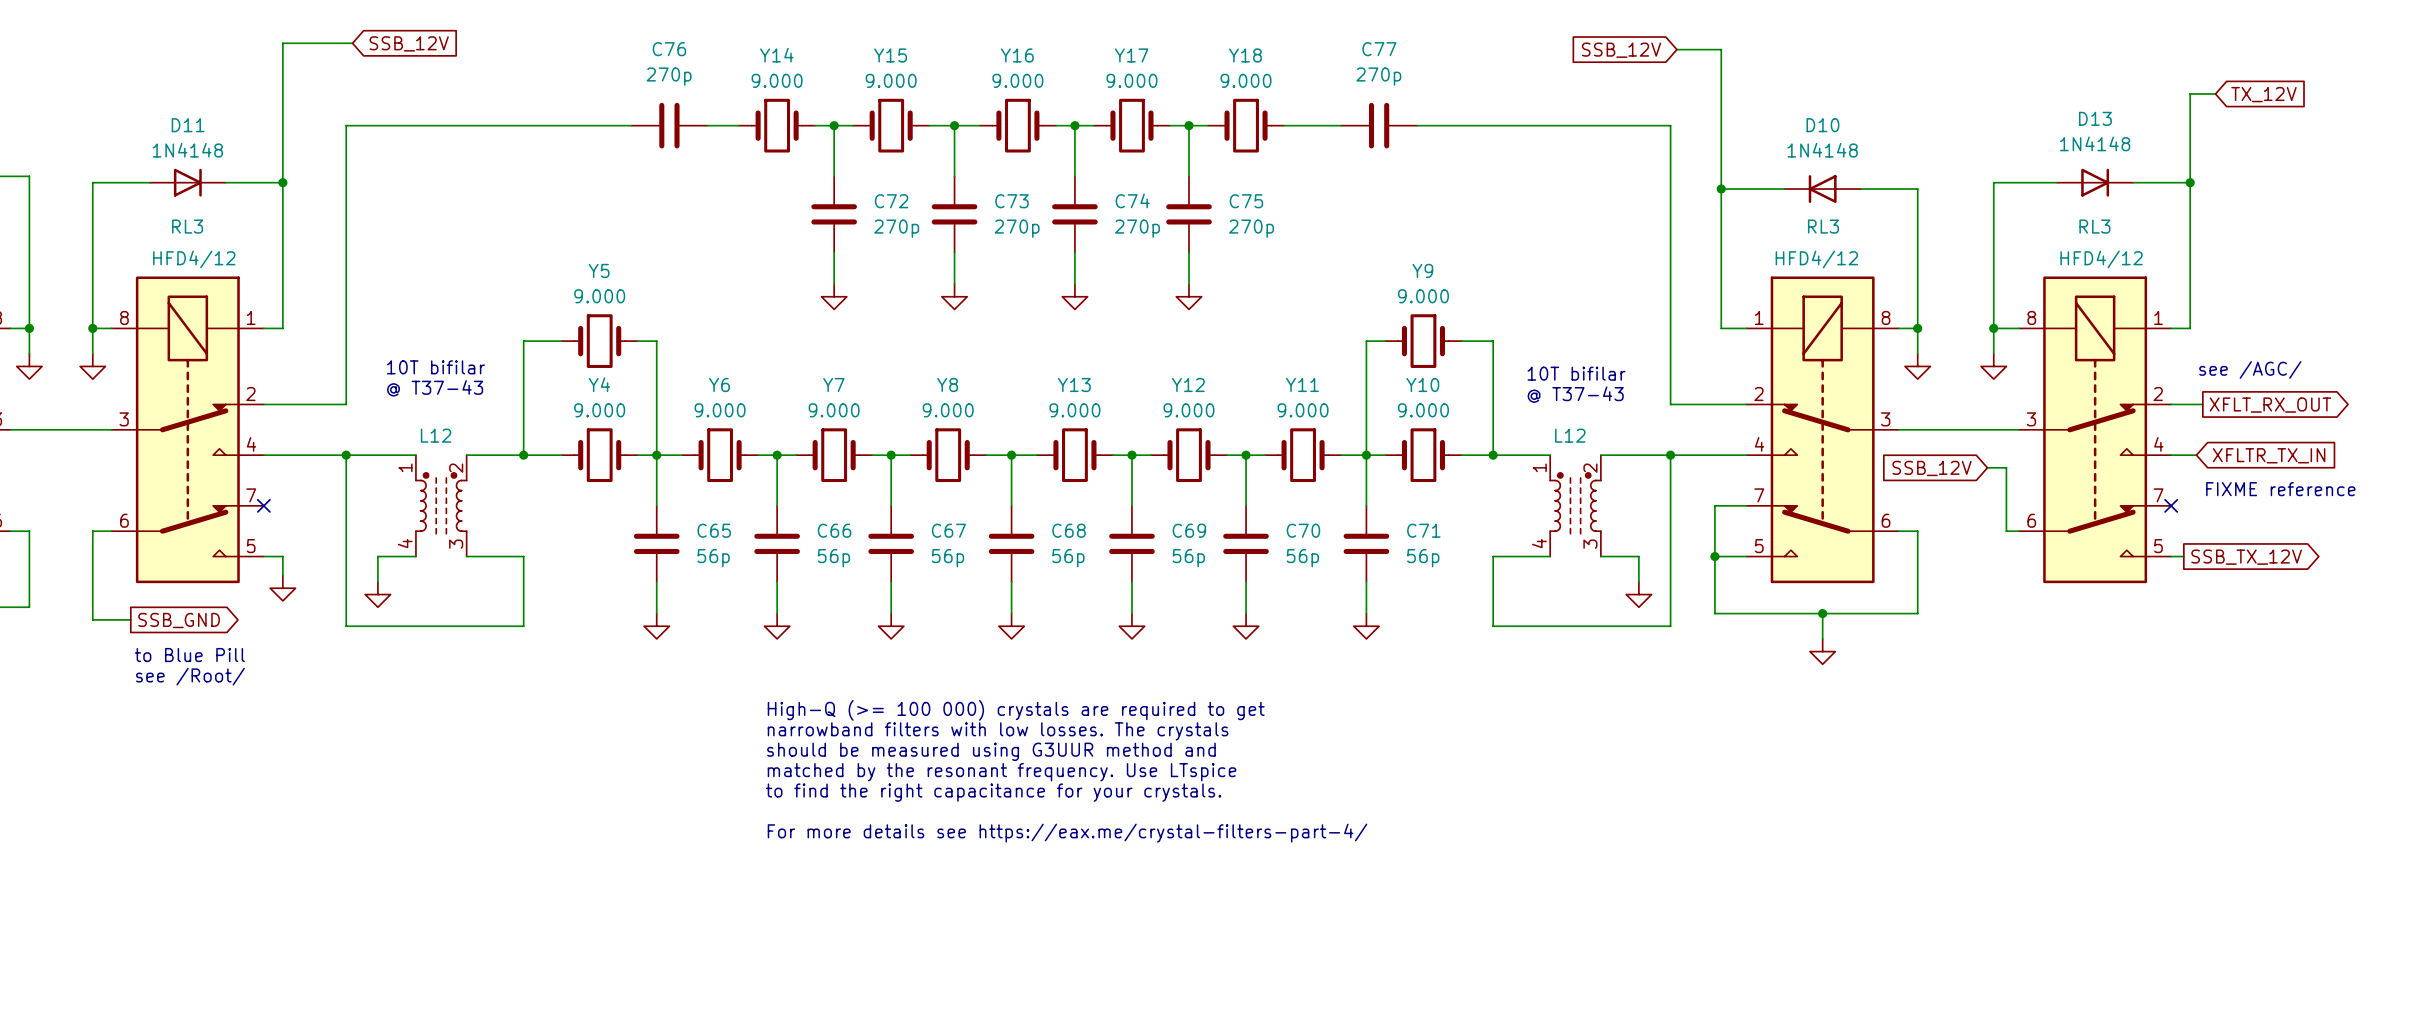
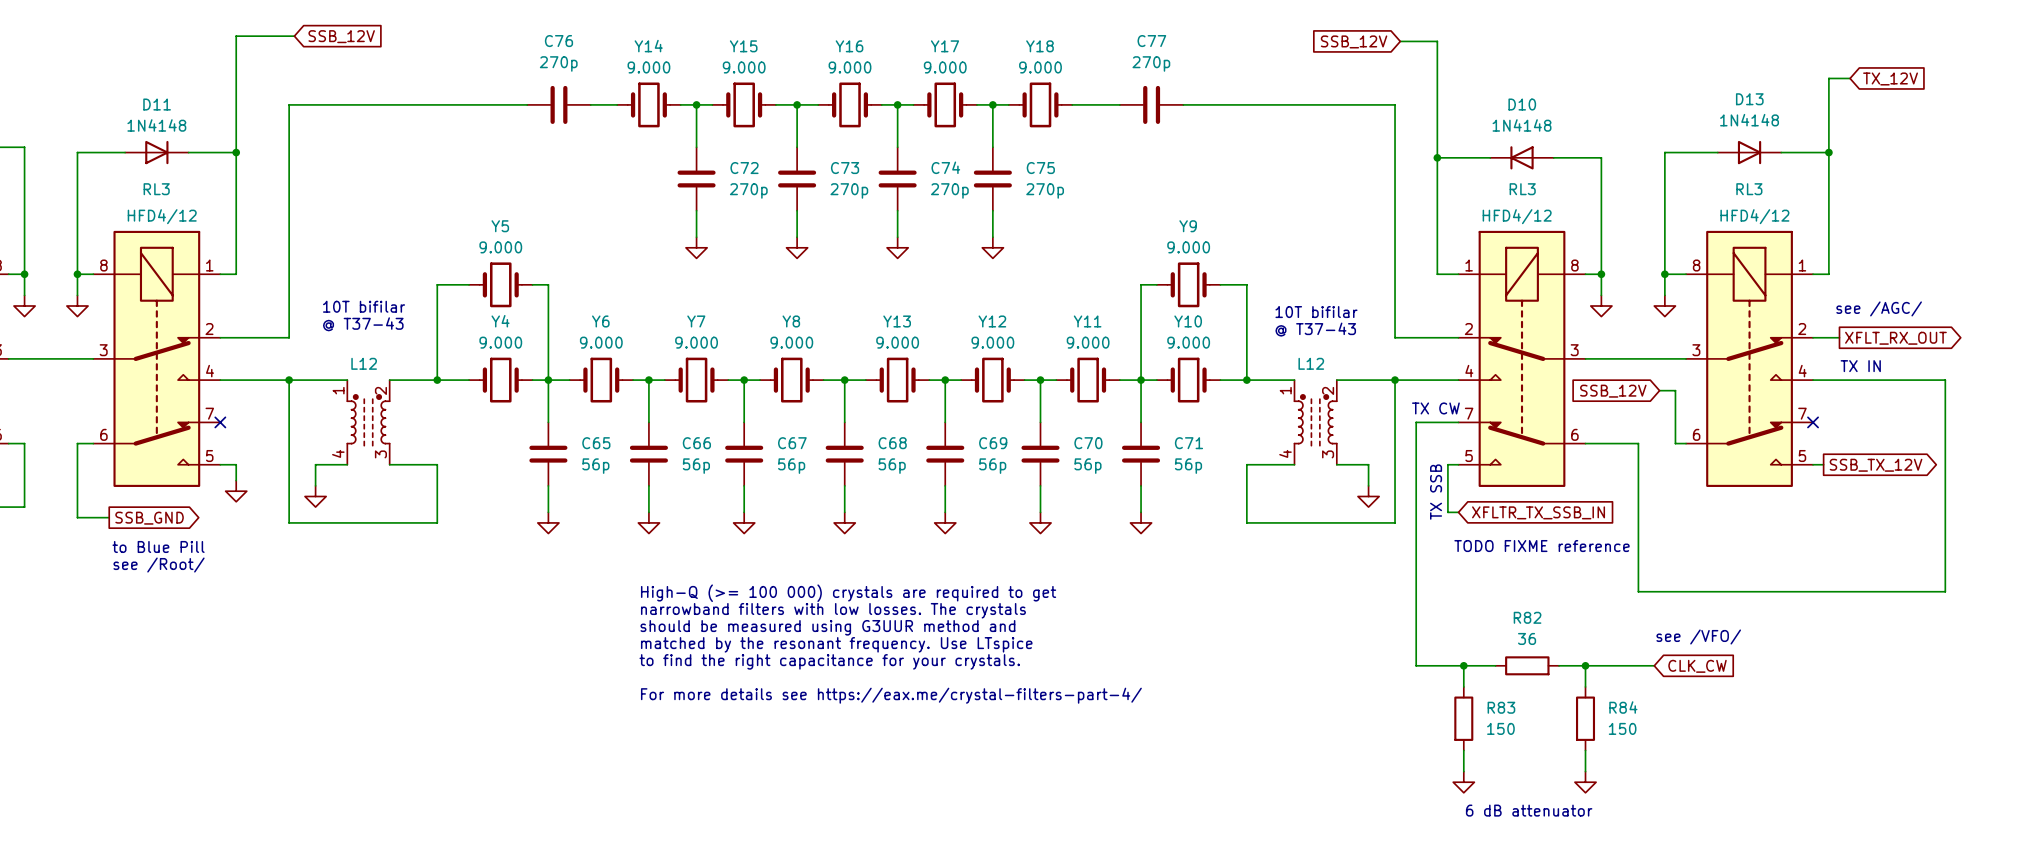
text: none -> TX IN (1860, 366)
global label: XFLTR_TX_IN (2269, 455) -> none
text: none -> TX CW (1435, 408)
text: FIXME reference (2280, 489) -> none
wire: (1714, 505) (1714, 613) (1733, 613) -> (1447, 464) (1447, 512)
wire: none -> (1432, 422) (1416, 422) (1416, 665) (1495, 665)
wire: (1917, 531) (1917, 613) (1746, 613) -> (1601, 443) (1638, 443) (1638, 591) (1945, 591) (1945, 380) (1834, 380)
wire: (1714, 556) (1733, 556) -> none
junction: (1714, 556) -> none
text: none -> TX SSB (1436, 492)
wire: (1822, 613) (1822, 638) -> (1463, 665) (1463, 686)
junction: (1822, 613) -> none
global label: none -> XFLTR_TX_SSB_IN (1538, 512)
power symbol: (1822, 651) -> none
text: none -> TODO FIXME reference (1541, 546)
text: none -> see /VFO/ (1698, 636)
junction: none -> (1463, 665)
R82: none -> 36 (1527, 665)
wire: none -> (1559, 665) (1654, 665)
wire: none -> (1585, 665) (1585, 686)
junction: none -> (1585, 665)
global label: none -> CLK_CW (1697, 666)
R83: none -> 150 (1463, 718)
R84: none -> 150 (1585, 718)
wire: none -> (1463, 750) (1463, 771)
wire: none -> (1585, 750) (1585, 771)
power symbol: none -> (1463, 782)
power symbol: none -> (1585, 782)
text: none -> 6 dB attenuator (1529, 810)

